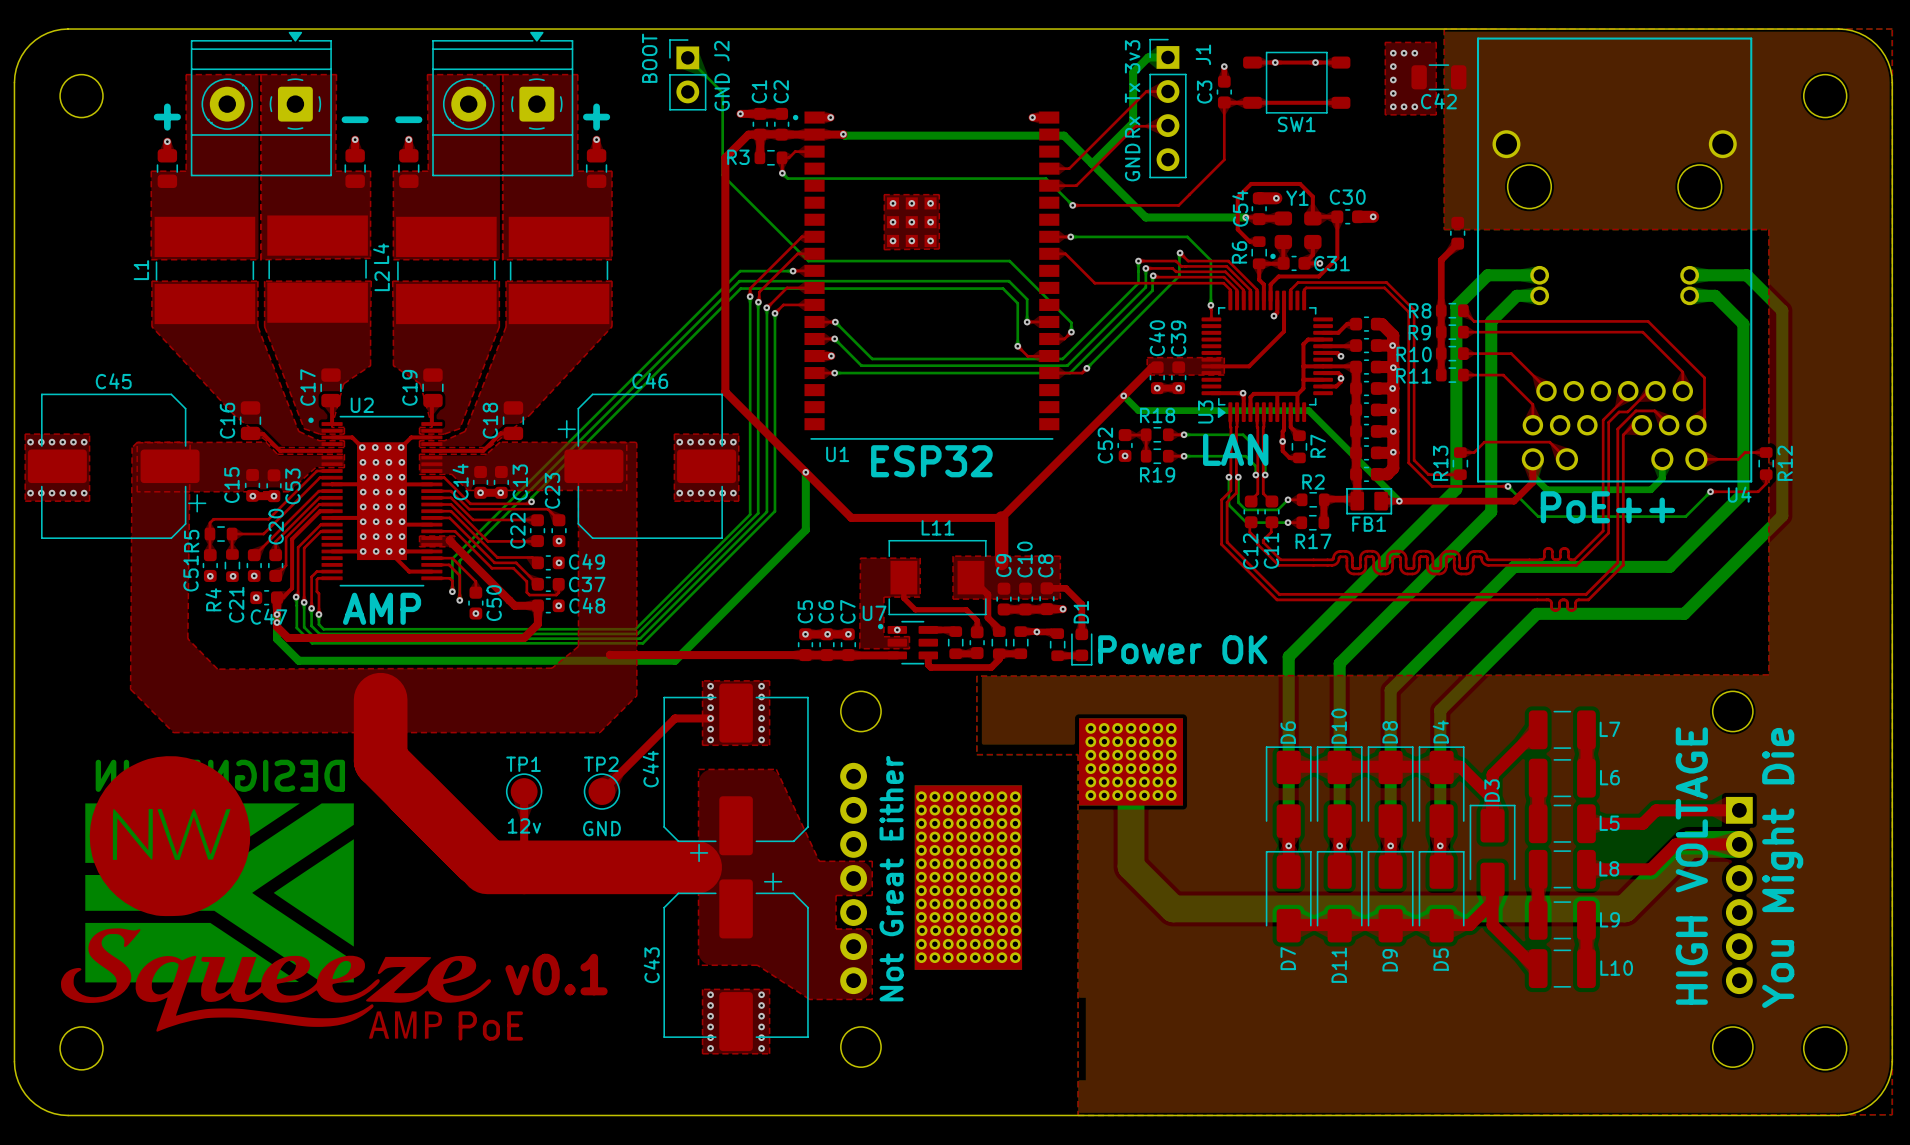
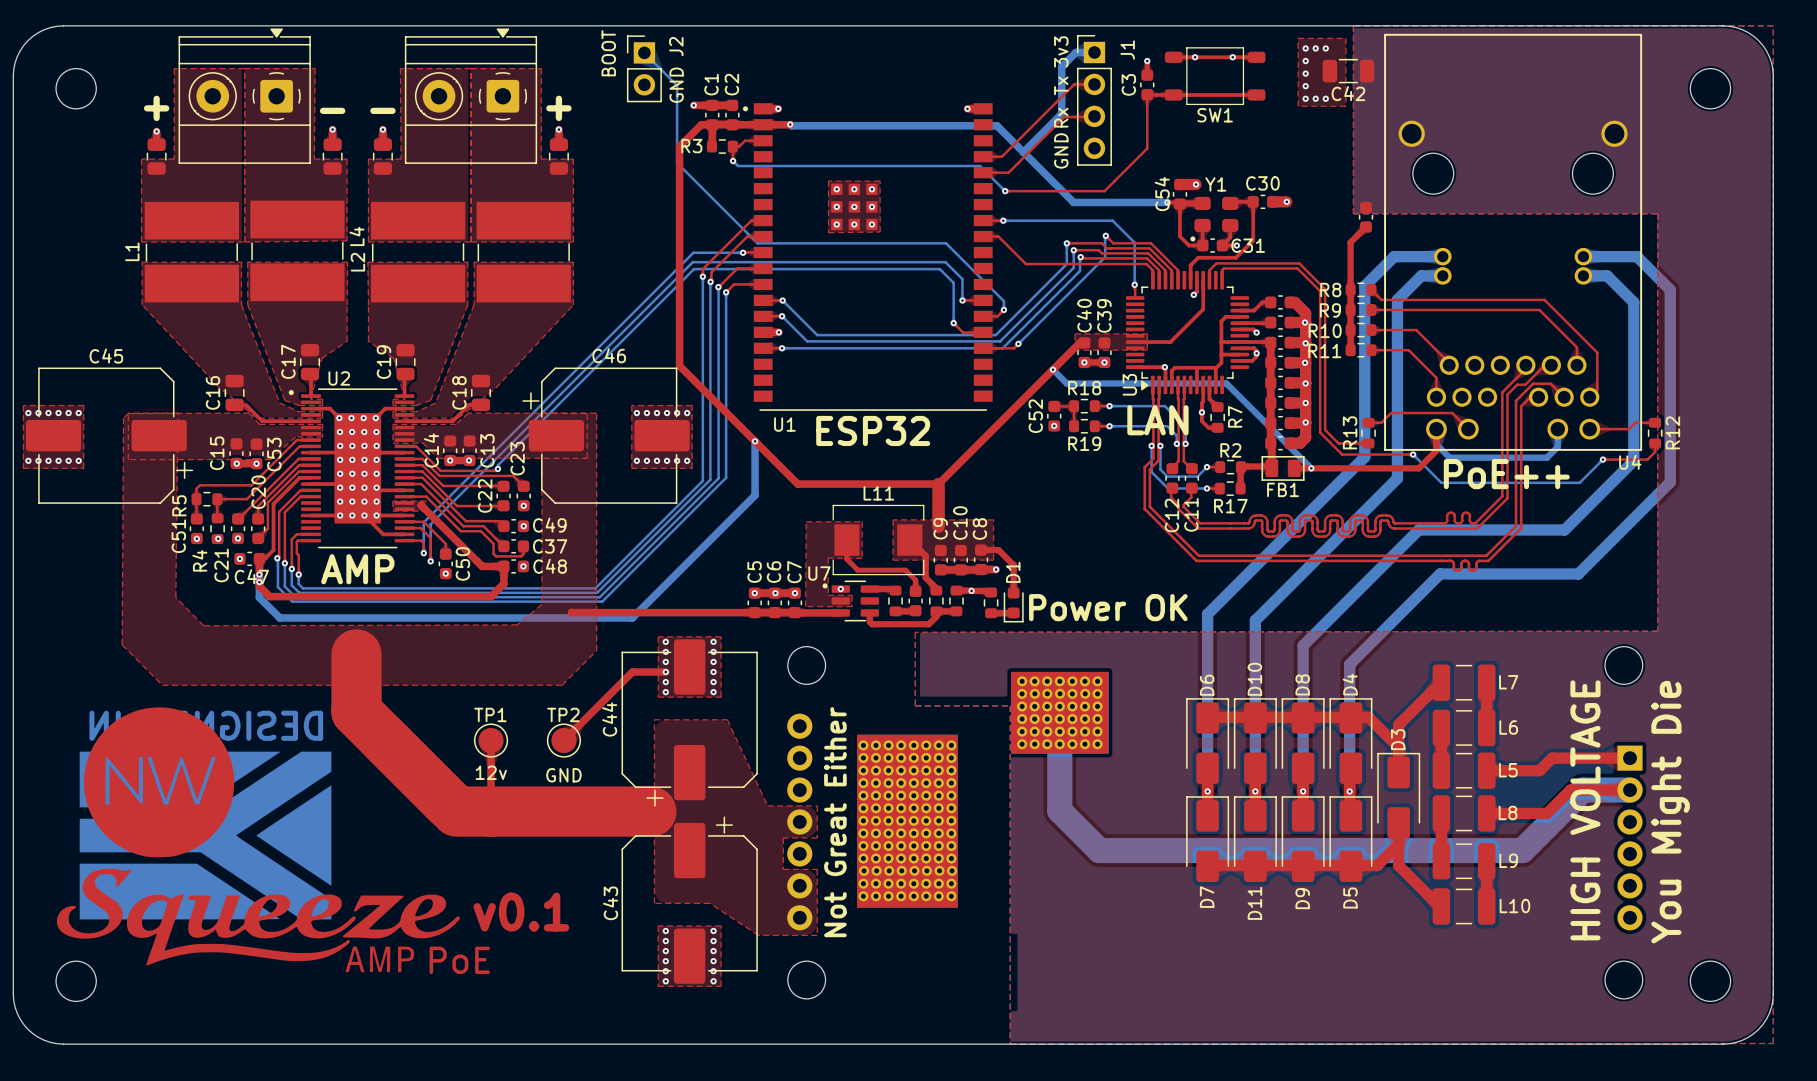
top track: (1312, 217) (1312, 196) (1300, 183) (1251, 183) (1237, 197) (1237, 229) (1249, 241) (1259, 241) -> none
top track: none -> (1179, 204) (1179, 236) (1189, 245) (1200, 245)
R6: (1259, 252) -> none
top track: (1259, 263) (1259, 279) (1263, 284) (1263, 300) -> none
top track: (1259, 263) (1283, 263) -> none

